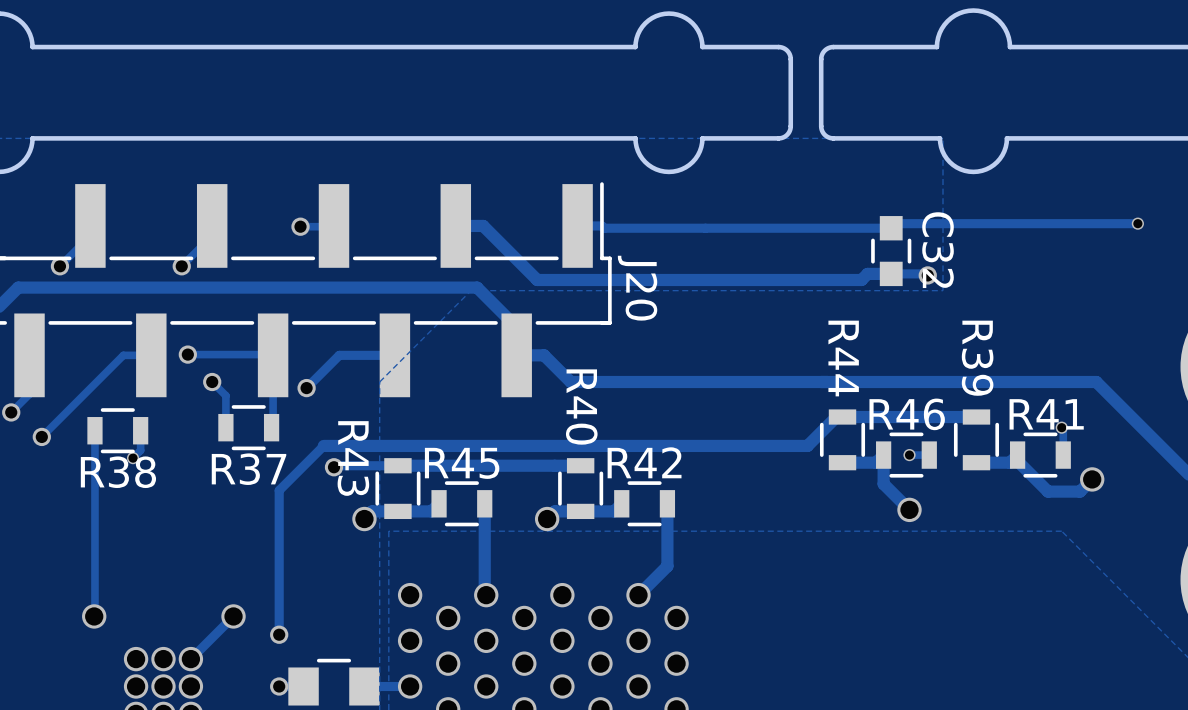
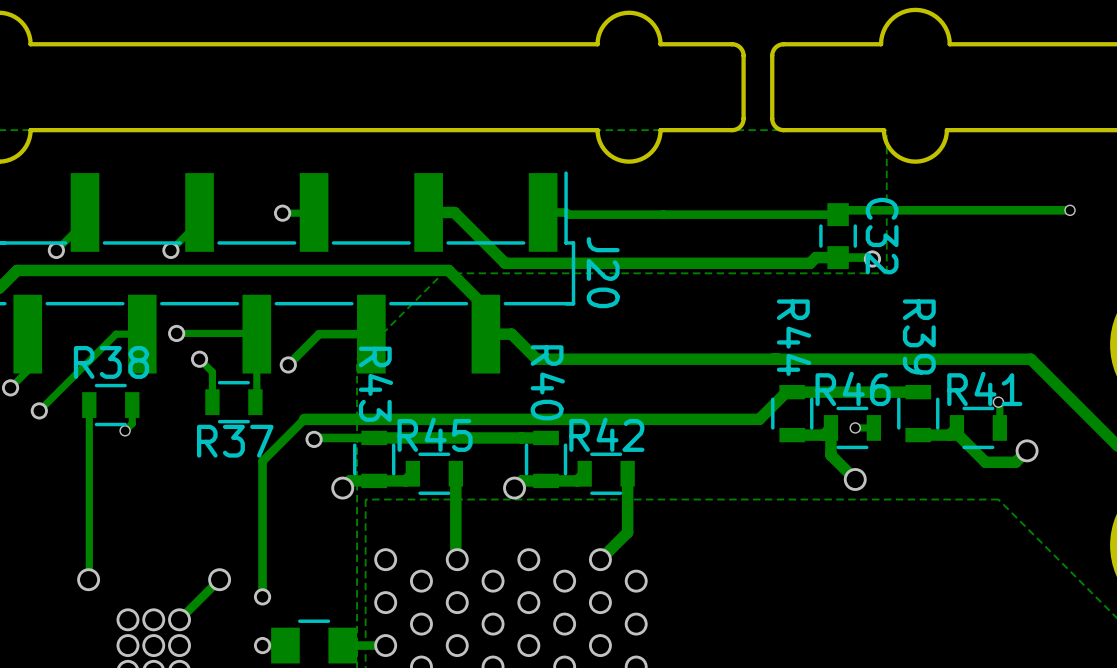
R43 name position: R43 (353, 458) -> R43 (375, 384)
R38 name position: R38 (118, 472) -> R38 (111, 362)

